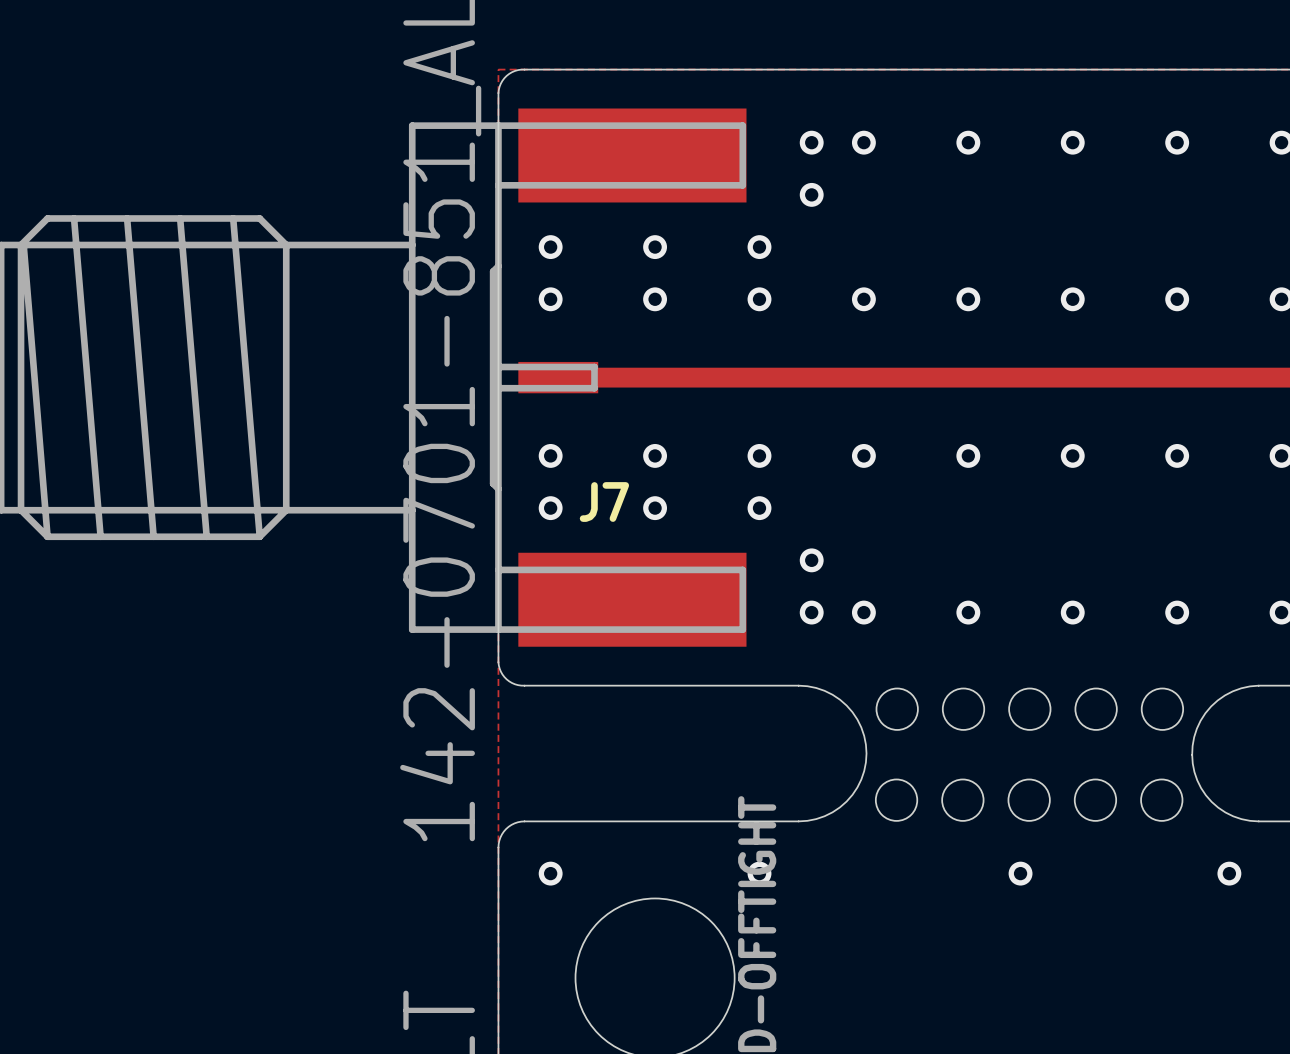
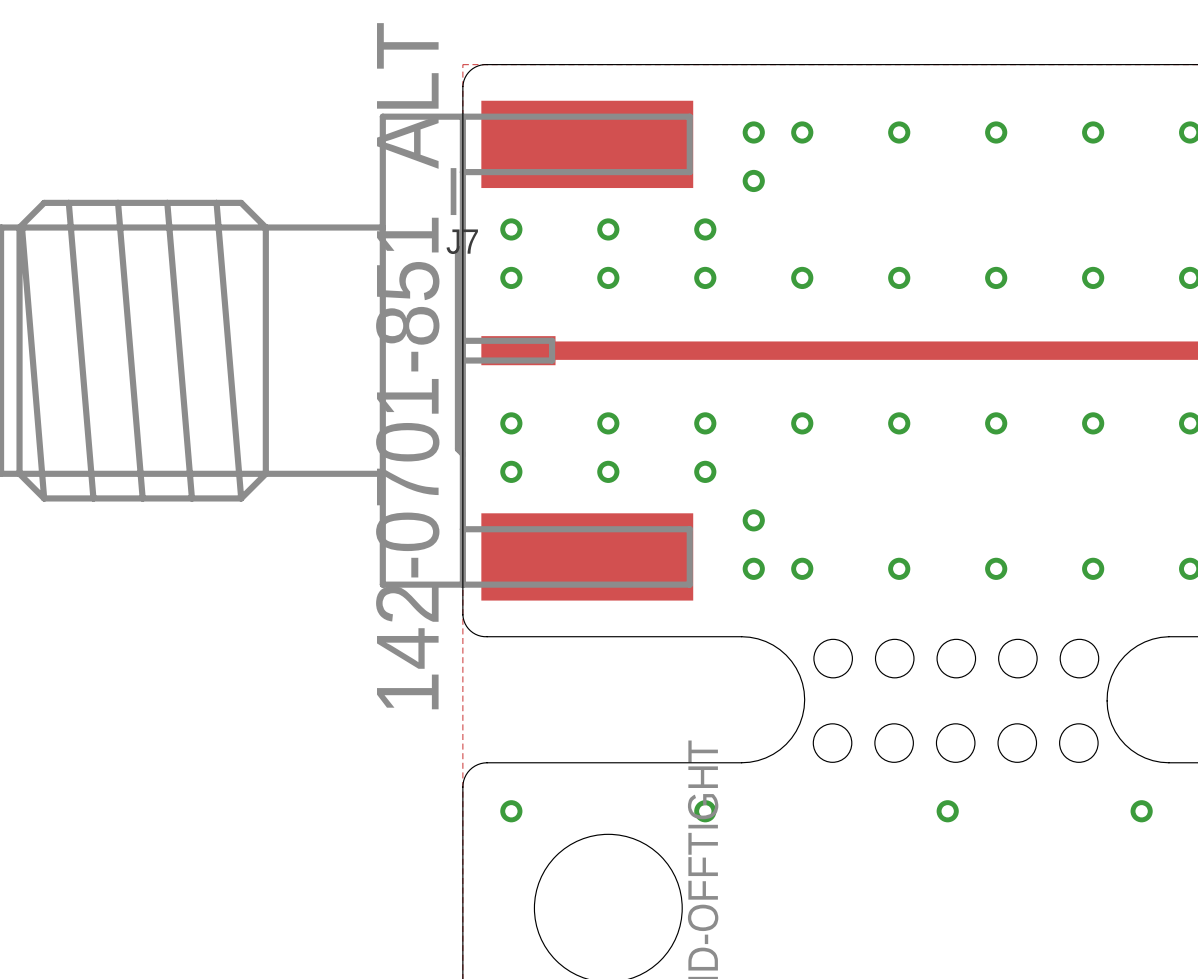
J7 name position: J7 (604, 502) -> J7 (462, 241)

